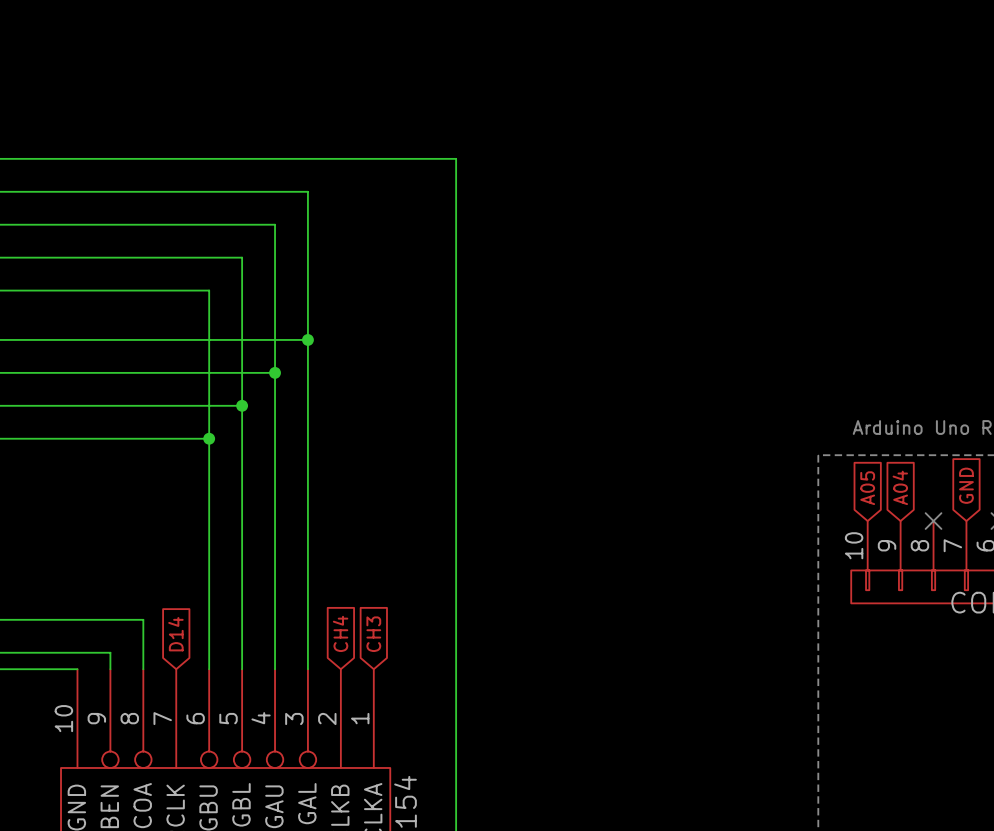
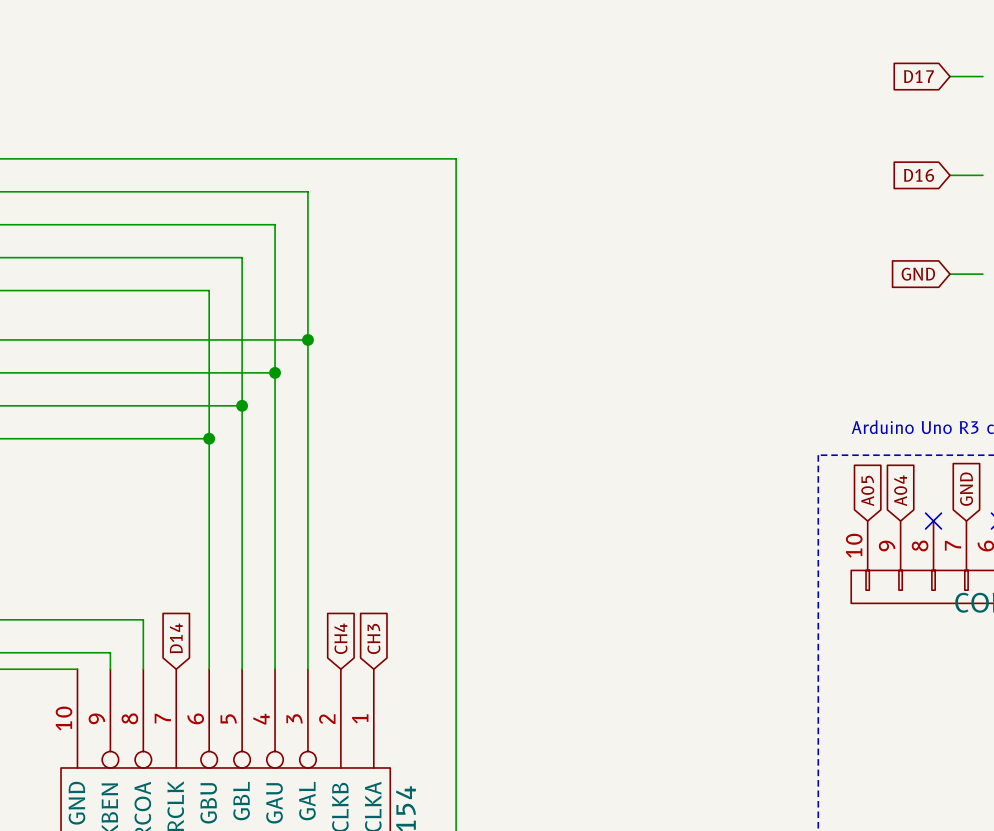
global label: none -> D17 (918, 76)
wire: none -> (949, 76) (982, 76)
global label: none -> D16 (919, 175)
wire: none -> (949, 175) (982, 175)
global label: none -> GND (918, 274)
wire: none -> (949, 274) (982, 274)

